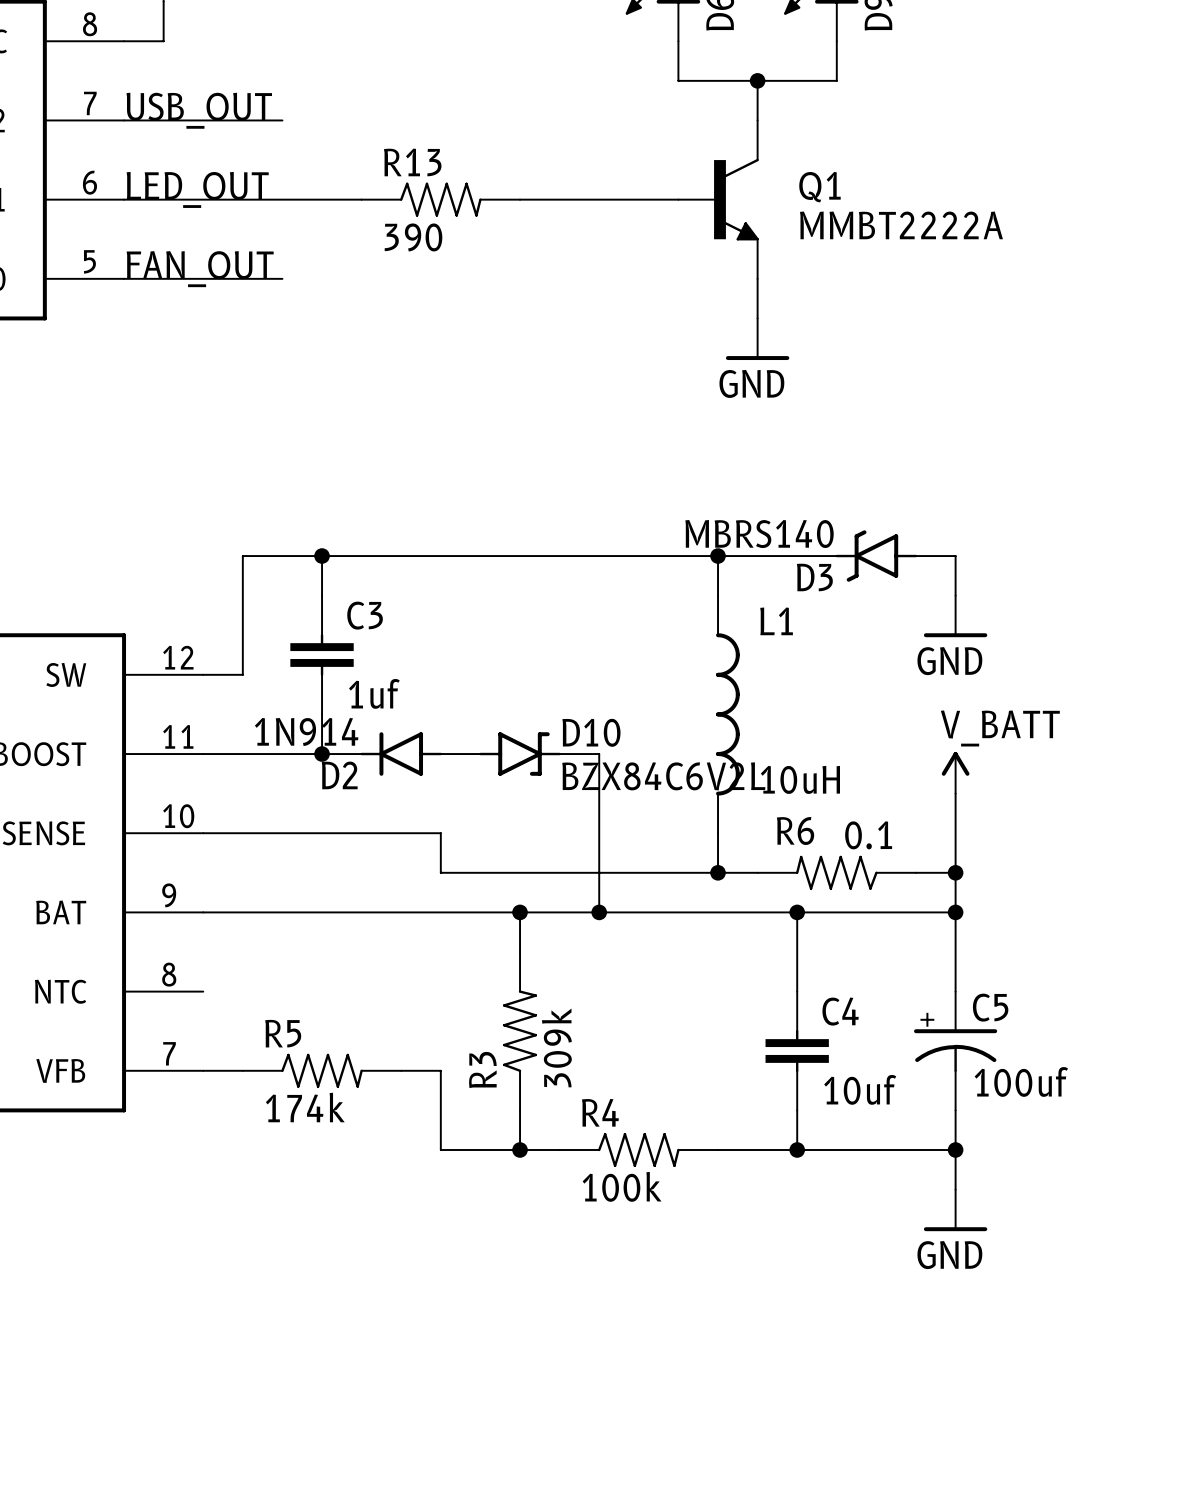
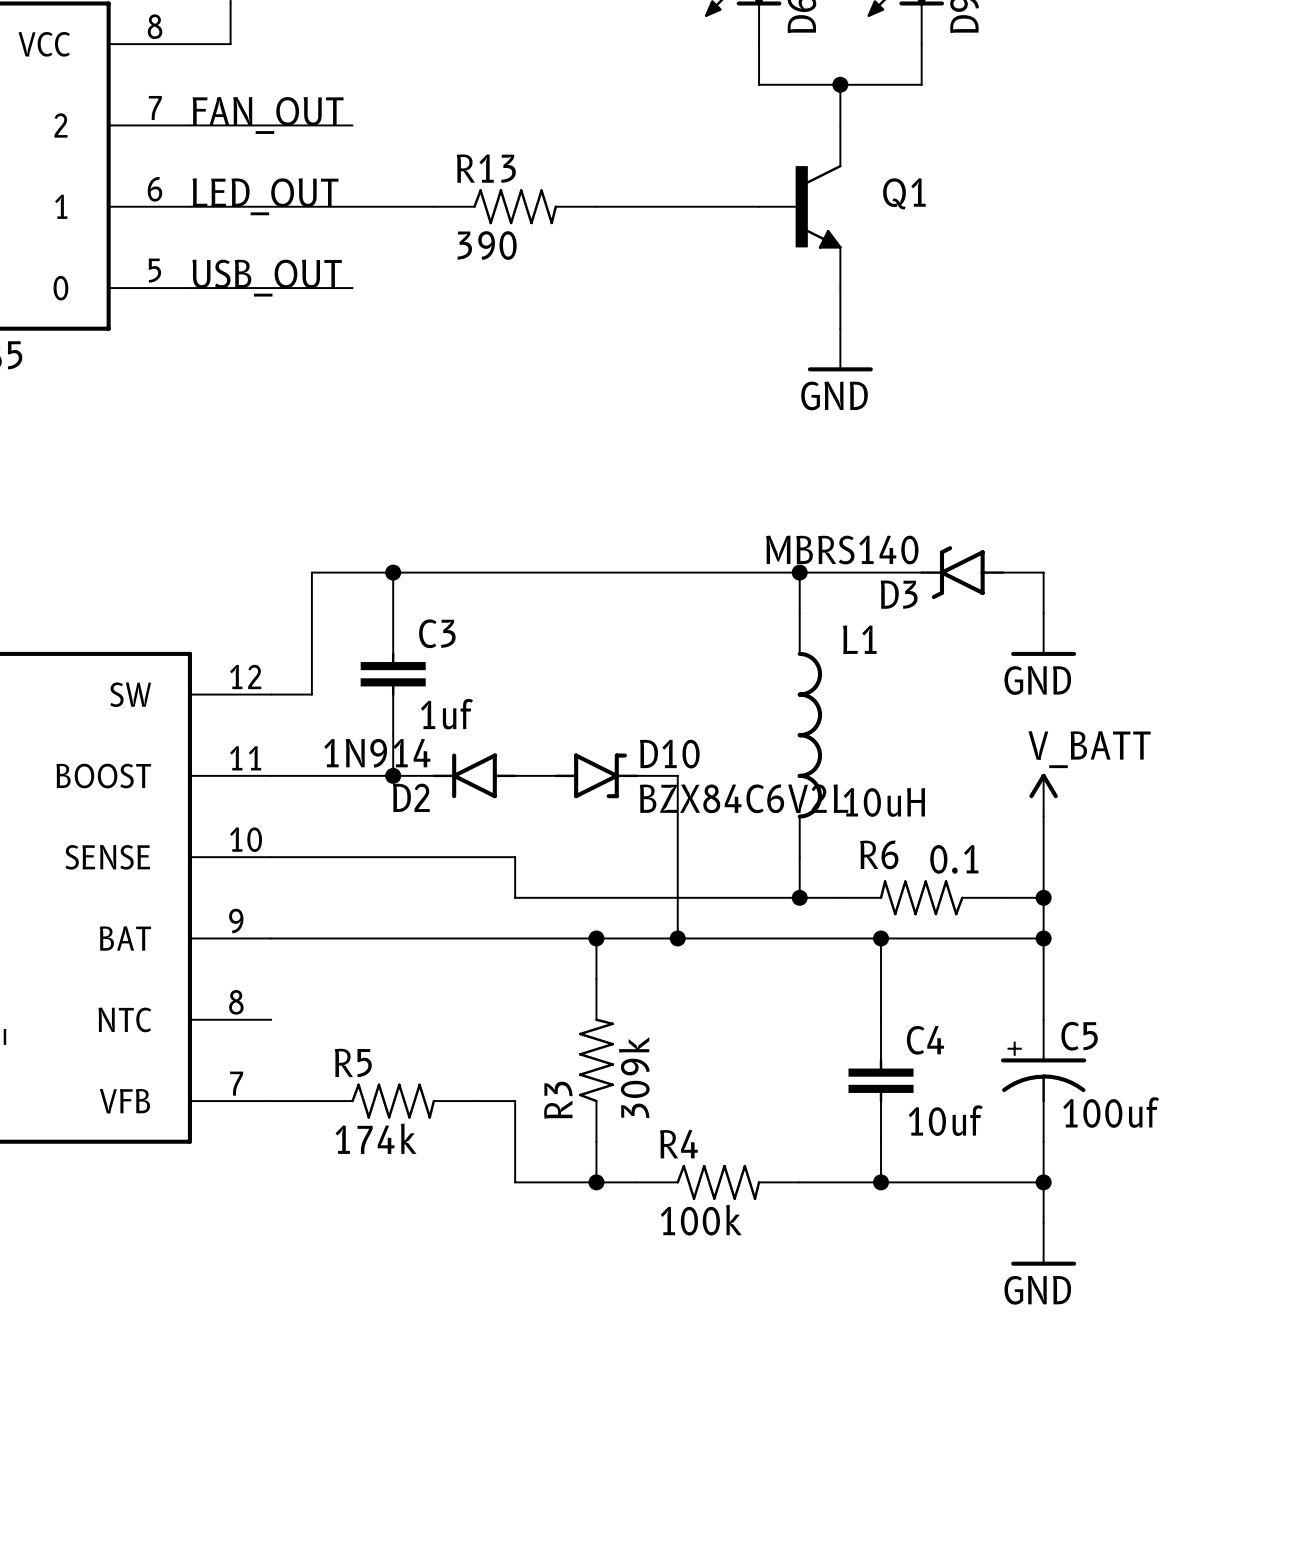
label: USB_OUT (199, 110) -> FAN_OUT (268, 115)
Q1 value: MMBT2222A (901, 225) -> none
label: FAN_OUT (200, 269) -> USB_OUT (267, 278)

